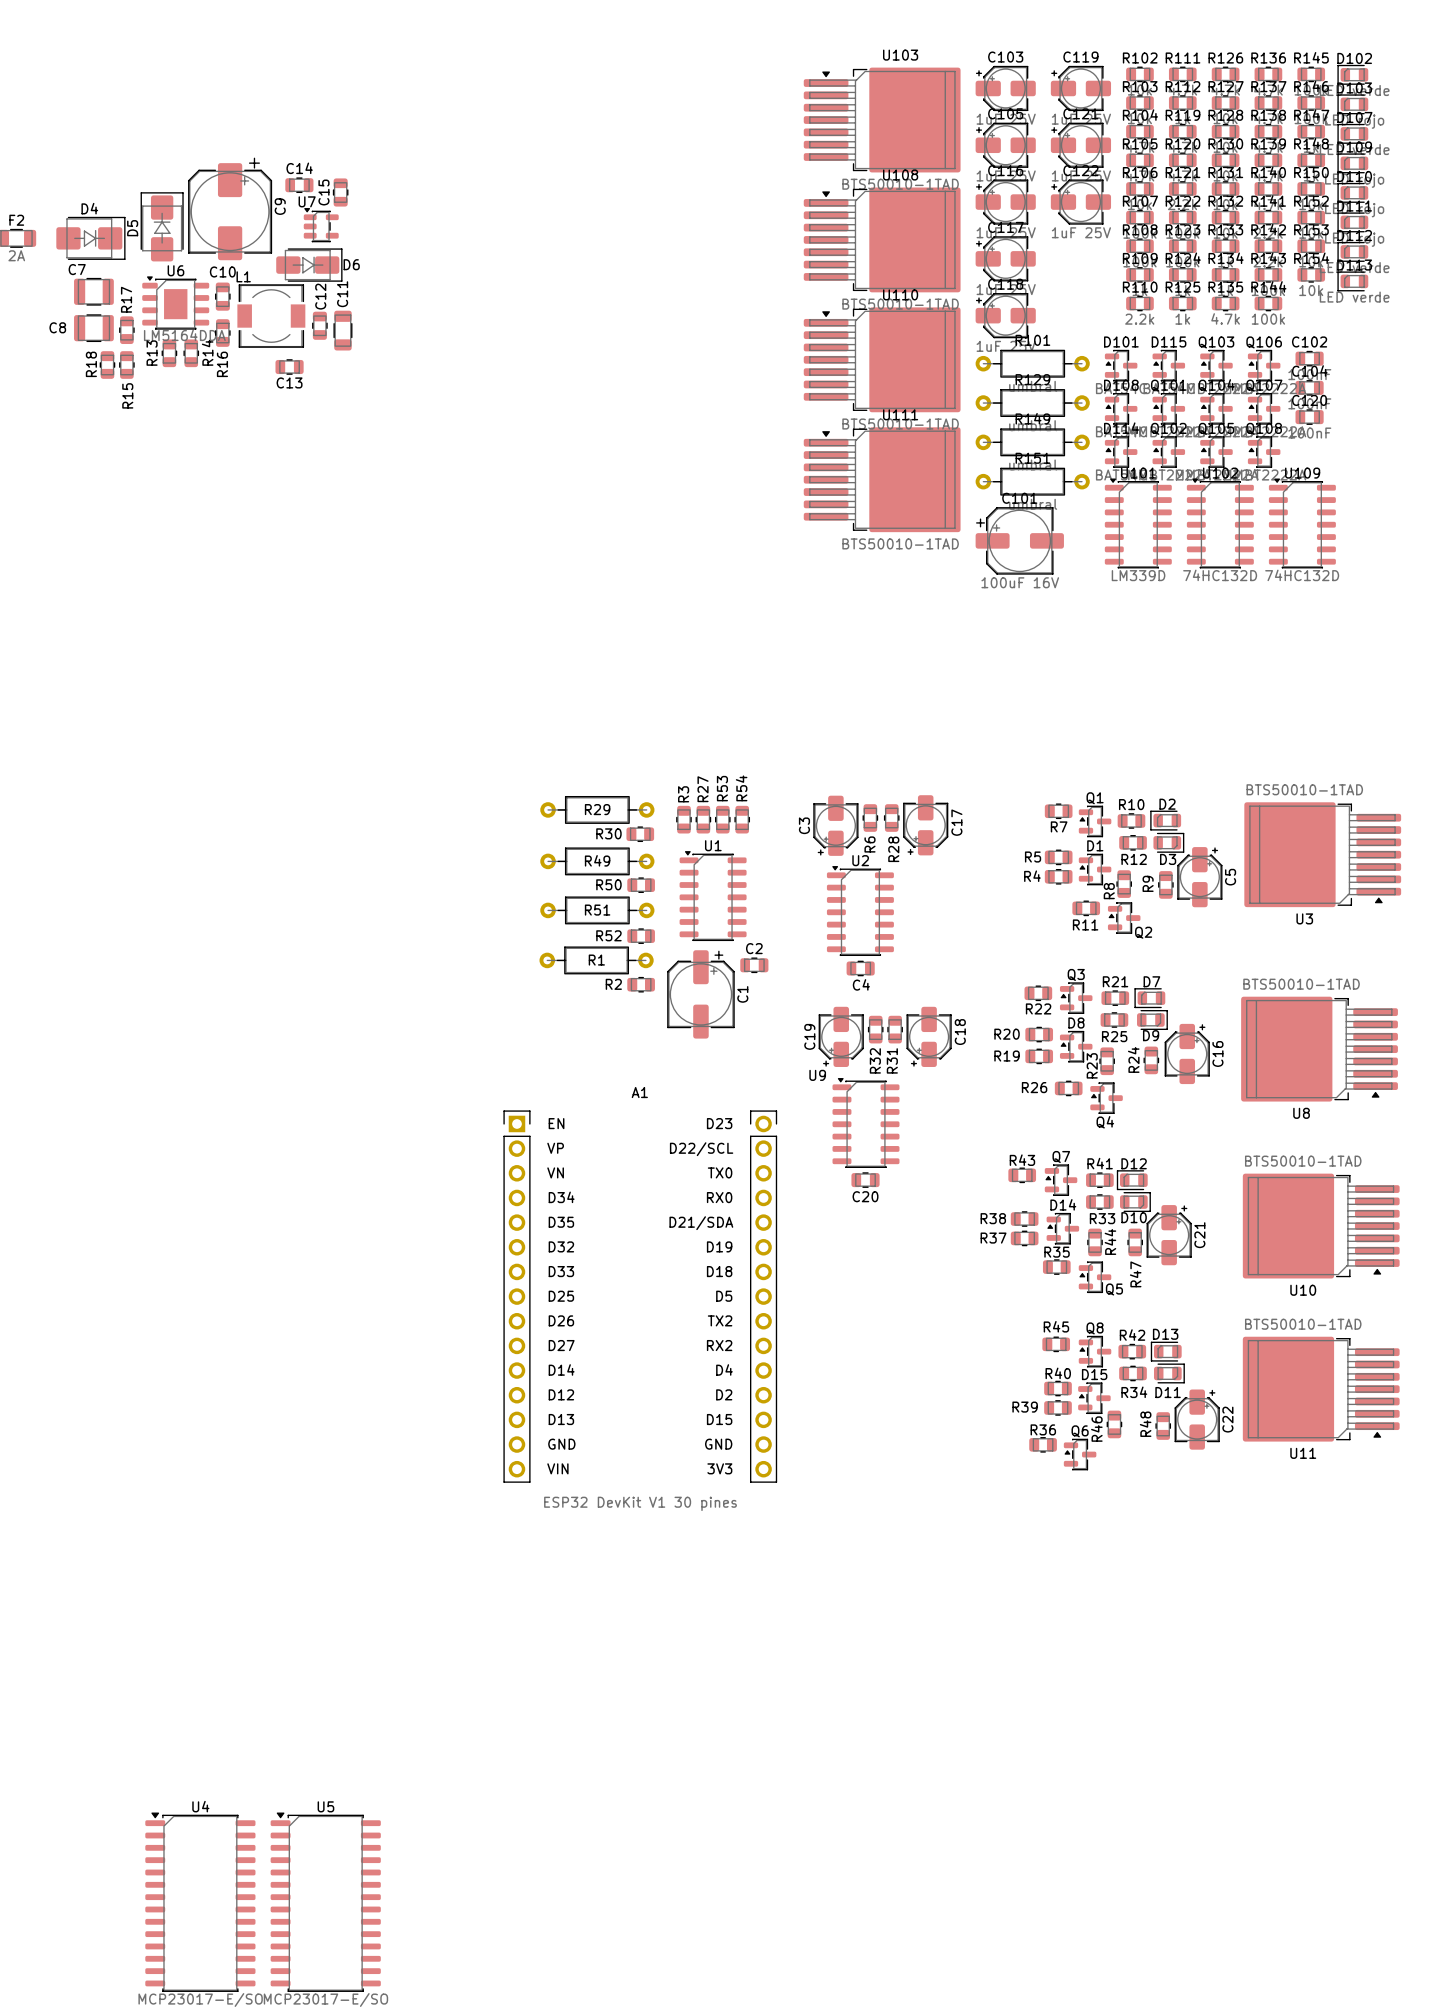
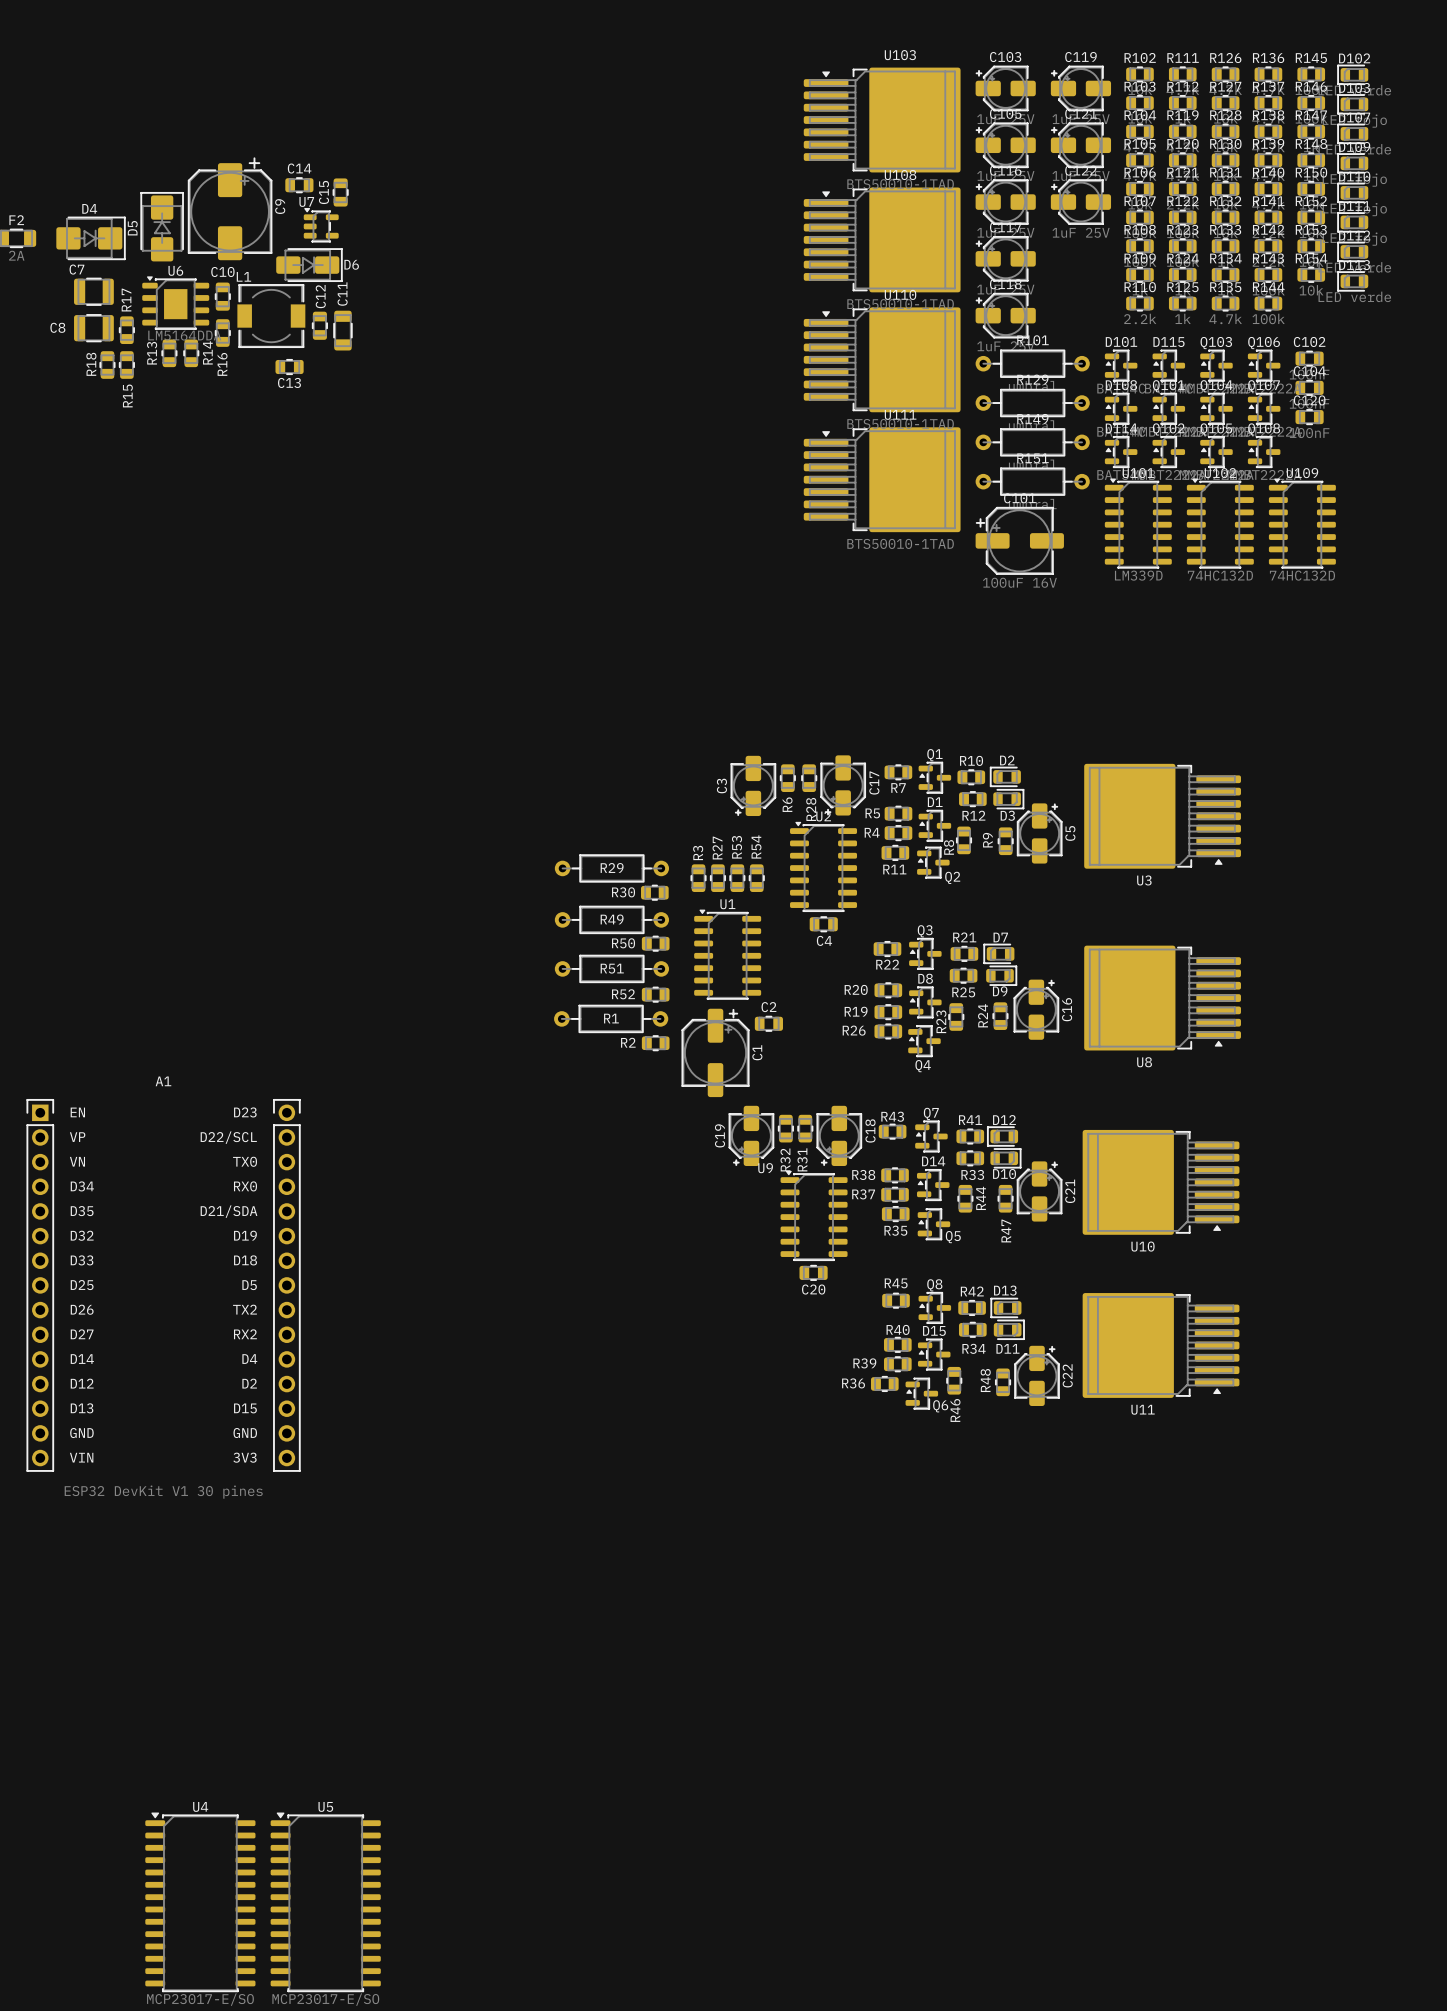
U3 value: BTS50010-1TAD (1304, 789) -> none
R29 position: (597, 809) -> (611, 868)
R7 position: (1058, 811) -> (898, 772)
R6 position: (870, 818) -> (787, 778)
R28 position: (891, 818) -> (809, 778)
R3 position: (683, 819) -> (698, 878)
R27 position: (703, 819) -> (717, 878)
R53 position: (722, 819) -> (737, 878)
R54 position: (742, 819) -> (756, 878)
R10 position: (1131, 820) -> (971, 777)
D2 position: (1165, 820) -> (1005, 776)
Q1 position: (1095, 821) -> (934, 777)
C3 position: (835, 825) -> (753, 785)
C17 position: (925, 825) -> (843, 785)
R30 position: (640, 834) -> (654, 892)
R12 position: (1133, 842) -> (972, 799)
D3 position: (1168, 842) -> (1008, 799)
U3 position: (1322, 854) -> (1162, 816)
R5 position: (1058, 857) -> (898, 813)
R49 position: (597, 861) -> (611, 919)
D1 position: (1095, 869) -> (934, 825)
R4 position: (1058, 876) -> (898, 833)
C5 position: (1199, 877) -> (1039, 833)
R8 position: (1124, 884) -> (964, 840)
R9 position: (1165, 884) -> (1005, 841)
R50 position: (641, 885) -> (655, 943)
U1 position: (713, 896) -> (727, 954)
R11 position: (1086, 908) -> (895, 852)
R51 position: (597, 910) -> (611, 968)
U2 position: (860, 910) -> (823, 866)
Q2 position: (1124, 918) -> (933, 862)
R52 position: (641, 936) -> (655, 994)
R1 position: (596, 960) -> (611, 1018)
C2 position: (754, 965) -> (768, 1023)
C4 position: (860, 968) -> (823, 924)
R2 position: (641, 984) -> (655, 1043)
U8 value: BTS50010-1TAD (1301, 984) -> none
R22 position: (1038, 993) -> (887, 949)
C1 position: (700, 994) -> (715, 1052)
Q3 position: (1076, 998) -> (925, 953)
R21 position: (1115, 998) -> (964, 953)
D7 position: (1149, 998) -> (999, 953)
R25 position: (1114, 1019) -> (963, 975)
D9 position: (1152, 1019) -> (1001, 975)
R32 position: (875, 1029) -> (785, 1128)
R31 position: (895, 1029) -> (805, 1128)
R20 position: (1039, 1034) -> (888, 990)
C19 position: (841, 1036) -> (751, 1135)
C18 position: (929, 1036) -> (839, 1135)
D8 position: (1076, 1046) -> (925, 1002)
U8 position: (1319, 1049) -> (1162, 998)
C16 position: (1187, 1053) -> (1036, 1009)
R19 position: (1039, 1056) -> (888, 1012)
R24 position: (1151, 1060) -> (1000, 1016)
R23 position: (1107, 1061) -> (956, 1016)
R26 position: (1068, 1088) -> (888, 1031)
Q4 position: (1106, 1098) -> (924, 1041)
U9 position: (866, 1122) -> (814, 1215)
U10 value: BTS50010-1TAD (1303, 1161) -> none
R43 position: (1022, 1175) -> (892, 1131)
C20 position: (865, 1180) -> (813, 1272)
Q7 position: (1061, 1180) -> (931, 1136)
R41 position: (1099, 1180) -> (970, 1136)
D12 position: (1132, 1180) -> (1002, 1136)
R33 position: (1099, 1202) -> (970, 1158)
D10 position: (1135, 1202) -> (1005, 1158)
R38 position: (1024, 1219) -> (895, 1175)
U10 position: (1321, 1226) -> (1161, 1182)
D14 position: (1062, 1228) -> (933, 1185)
C21 position: (1169, 1235) -> (1039, 1191)
R37 position: (1024, 1238) -> (895, 1194)
R44 position: (1095, 1242) -> (965, 1198)
R47 position: (1135, 1242) -> (1005, 1198)
R35 name position: R35 (1057, 1252) -> R35 (895, 1230)
R35 position: (1056, 1267) -> (895, 1214)
Q5 position: (1095, 1277) -> (933, 1224)
A1 position: (640, 1296) -> (163, 1285)
U11 value: BTS50010-1TAD (1303, 1324) -> none
R45 position: (1056, 1344) -> (895, 1300)
Q8 position: (1095, 1351) -> (934, 1307)
R42 position: (1132, 1351) -> (972, 1307)
D13 position: (1166, 1351) -> (1006, 1307)
R34 position: (1133, 1373) -> (972, 1329)
D11 position: (1169, 1373) -> (1009, 1329)
R40 position: (1058, 1388) -> (897, 1344)
U11 position: (1321, 1389) -> (1161, 1345)
D15 position: (1094, 1398) -> (934, 1354)
R39 position: (1058, 1407) -> (897, 1364)
C22 position: (1197, 1419) -> (1037, 1375)
R46 position: (1114, 1424) -> (954, 1380)
R48 position: (1163, 1426) -> (1003, 1382)
R36 name position: R36 (1043, 1429) -> R36 (853, 1383)
R46 name position: R46 (1096, 1429) -> R46 (955, 1410)
Q6 name position: Q6 (1080, 1431) -> Q6 (940, 1406)
R36 position: (1043, 1444) -> (884, 1383)
Q6 position: (1080, 1454) -> (921, 1393)

